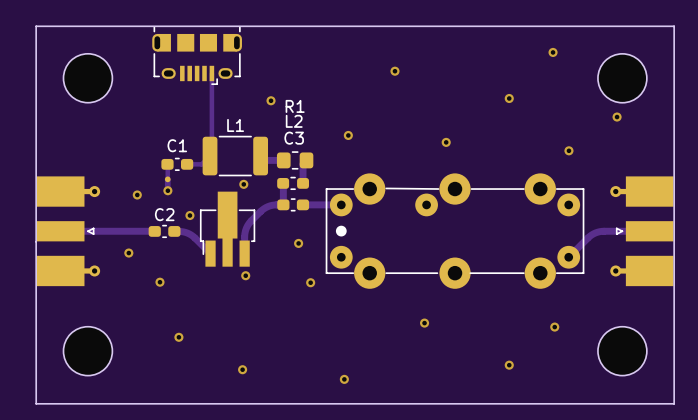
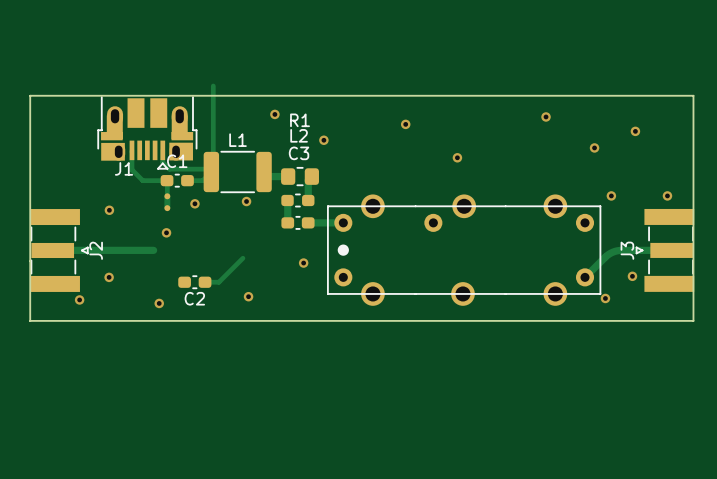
via: (553, 52) -> none
part: (197, 55) -> none
via: (394, 71) -> none
part: (87, 78) -> none
part: (622, 78) -> none
board edge: (36, 82) (36, 26) (674, 26) (674, 403) (36, 403) (36, 241) -> (30, 95) (693, 95) (693, 320) (30, 320) (30, 261)
via position: (509, 98) -> (546, 116)
via: none -> (405, 124)
J1: none -> (147, 132)
via: none -> (323, 140)
via: none -> (594, 147)
track: none -> (162, 150) (162, 162) (169, 169) (208, 169) (211, 172) (207, 168)
via: (348, 135) -> none
track: none -> (130, 151) (131, 150) (131, 169) (142, 180) (168, 181)
via: (568, 150) -> none
part footprint: [325, 173, 585, 289] -> [327, 194, 602, 306]
via: none -> (611, 195)
via: none -> (667, 195)
via: none -> (194, 203)
via: (167, 190) -> none
via: none -> (109, 210)
via: (137, 194) -> none
track: (283, 204) (265, 207) (249, 223) (244, 233) (244, 253) -> none
C2 name position: C2 (164, 214) -> C2 (194, 298)
via: none -> (166, 232)
via: (189, 215) -> none
part: (227, 229) -> none
J2: none -> (59, 250)
part: (68, 231) -> none
C2 position: (164, 231) -> (194, 282)
track: (174, 231) (183, 231) (191, 235) (210, 253) -> none
part: (641, 231) -> none
J3: none -> (665, 250)
track: none -> (242, 258) (218, 282) (205, 282)
via position: (128, 253) -> (109, 277)
via: none -> (632, 276)
via: none -> (605, 298)
via: none -> (79, 299)
via: (310, 282) -> none
via: (424, 323) -> none
via: (554, 327) -> none
via: (178, 337) -> none
part: (87, 351) -> none
part: (622, 351) -> none
via: (509, 365) -> none
via: (242, 369) -> none
via: (344, 379) -> none

